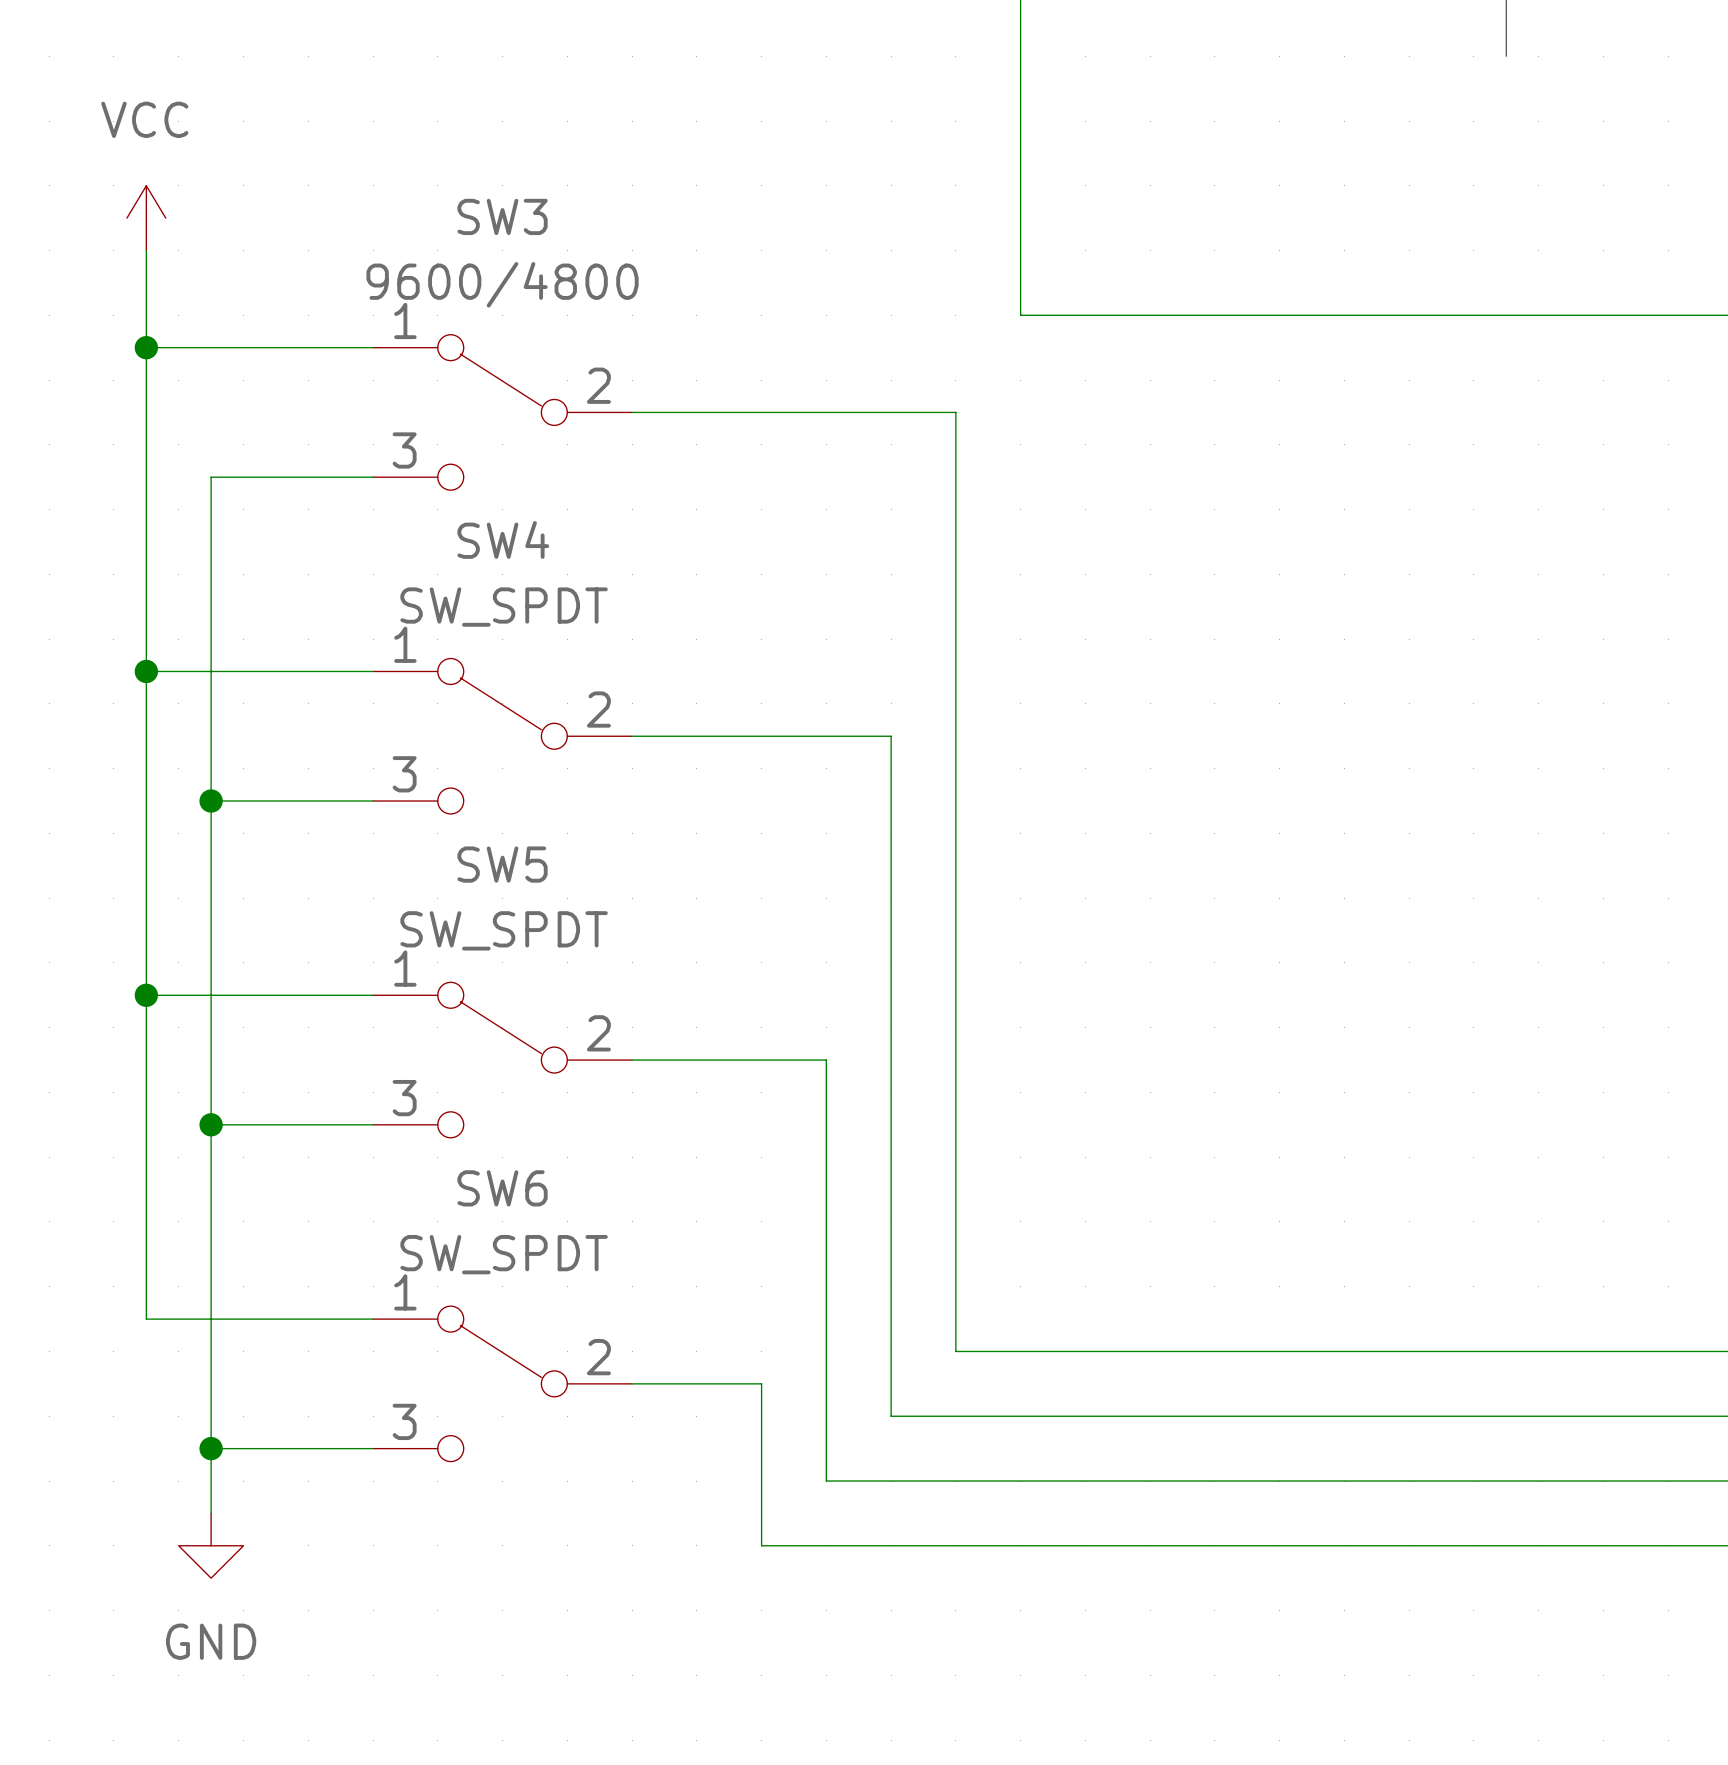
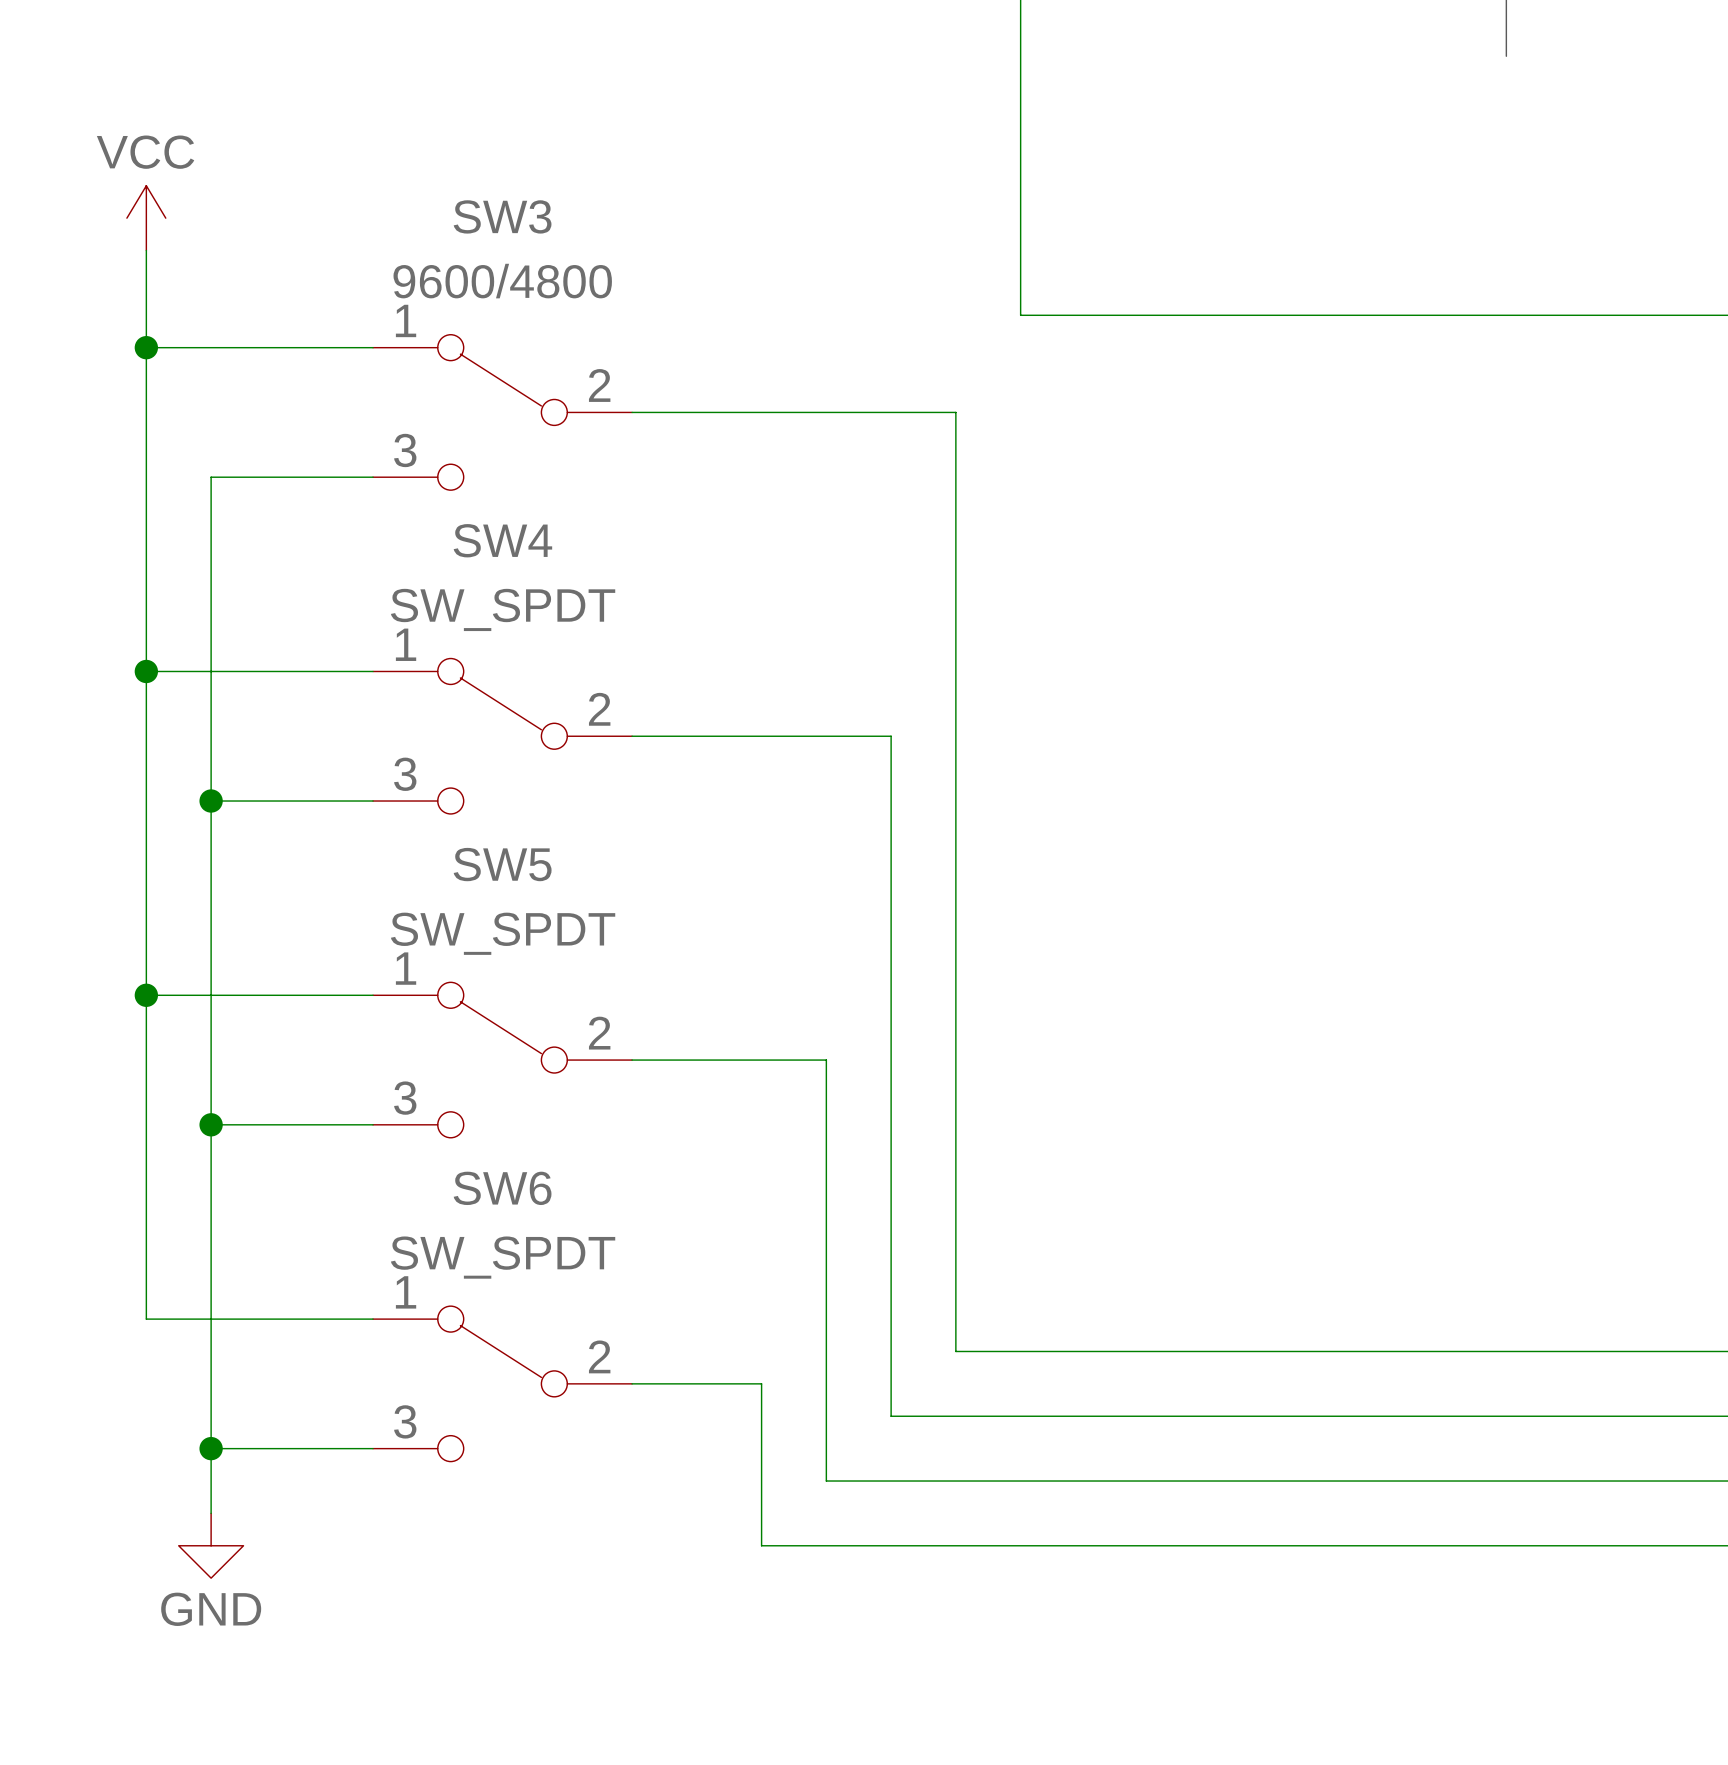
power symbol text position: VCC (144, 119) -> VCC (145, 152)
power symbol text position: GND (211, 1641) -> GND (211, 1609)

